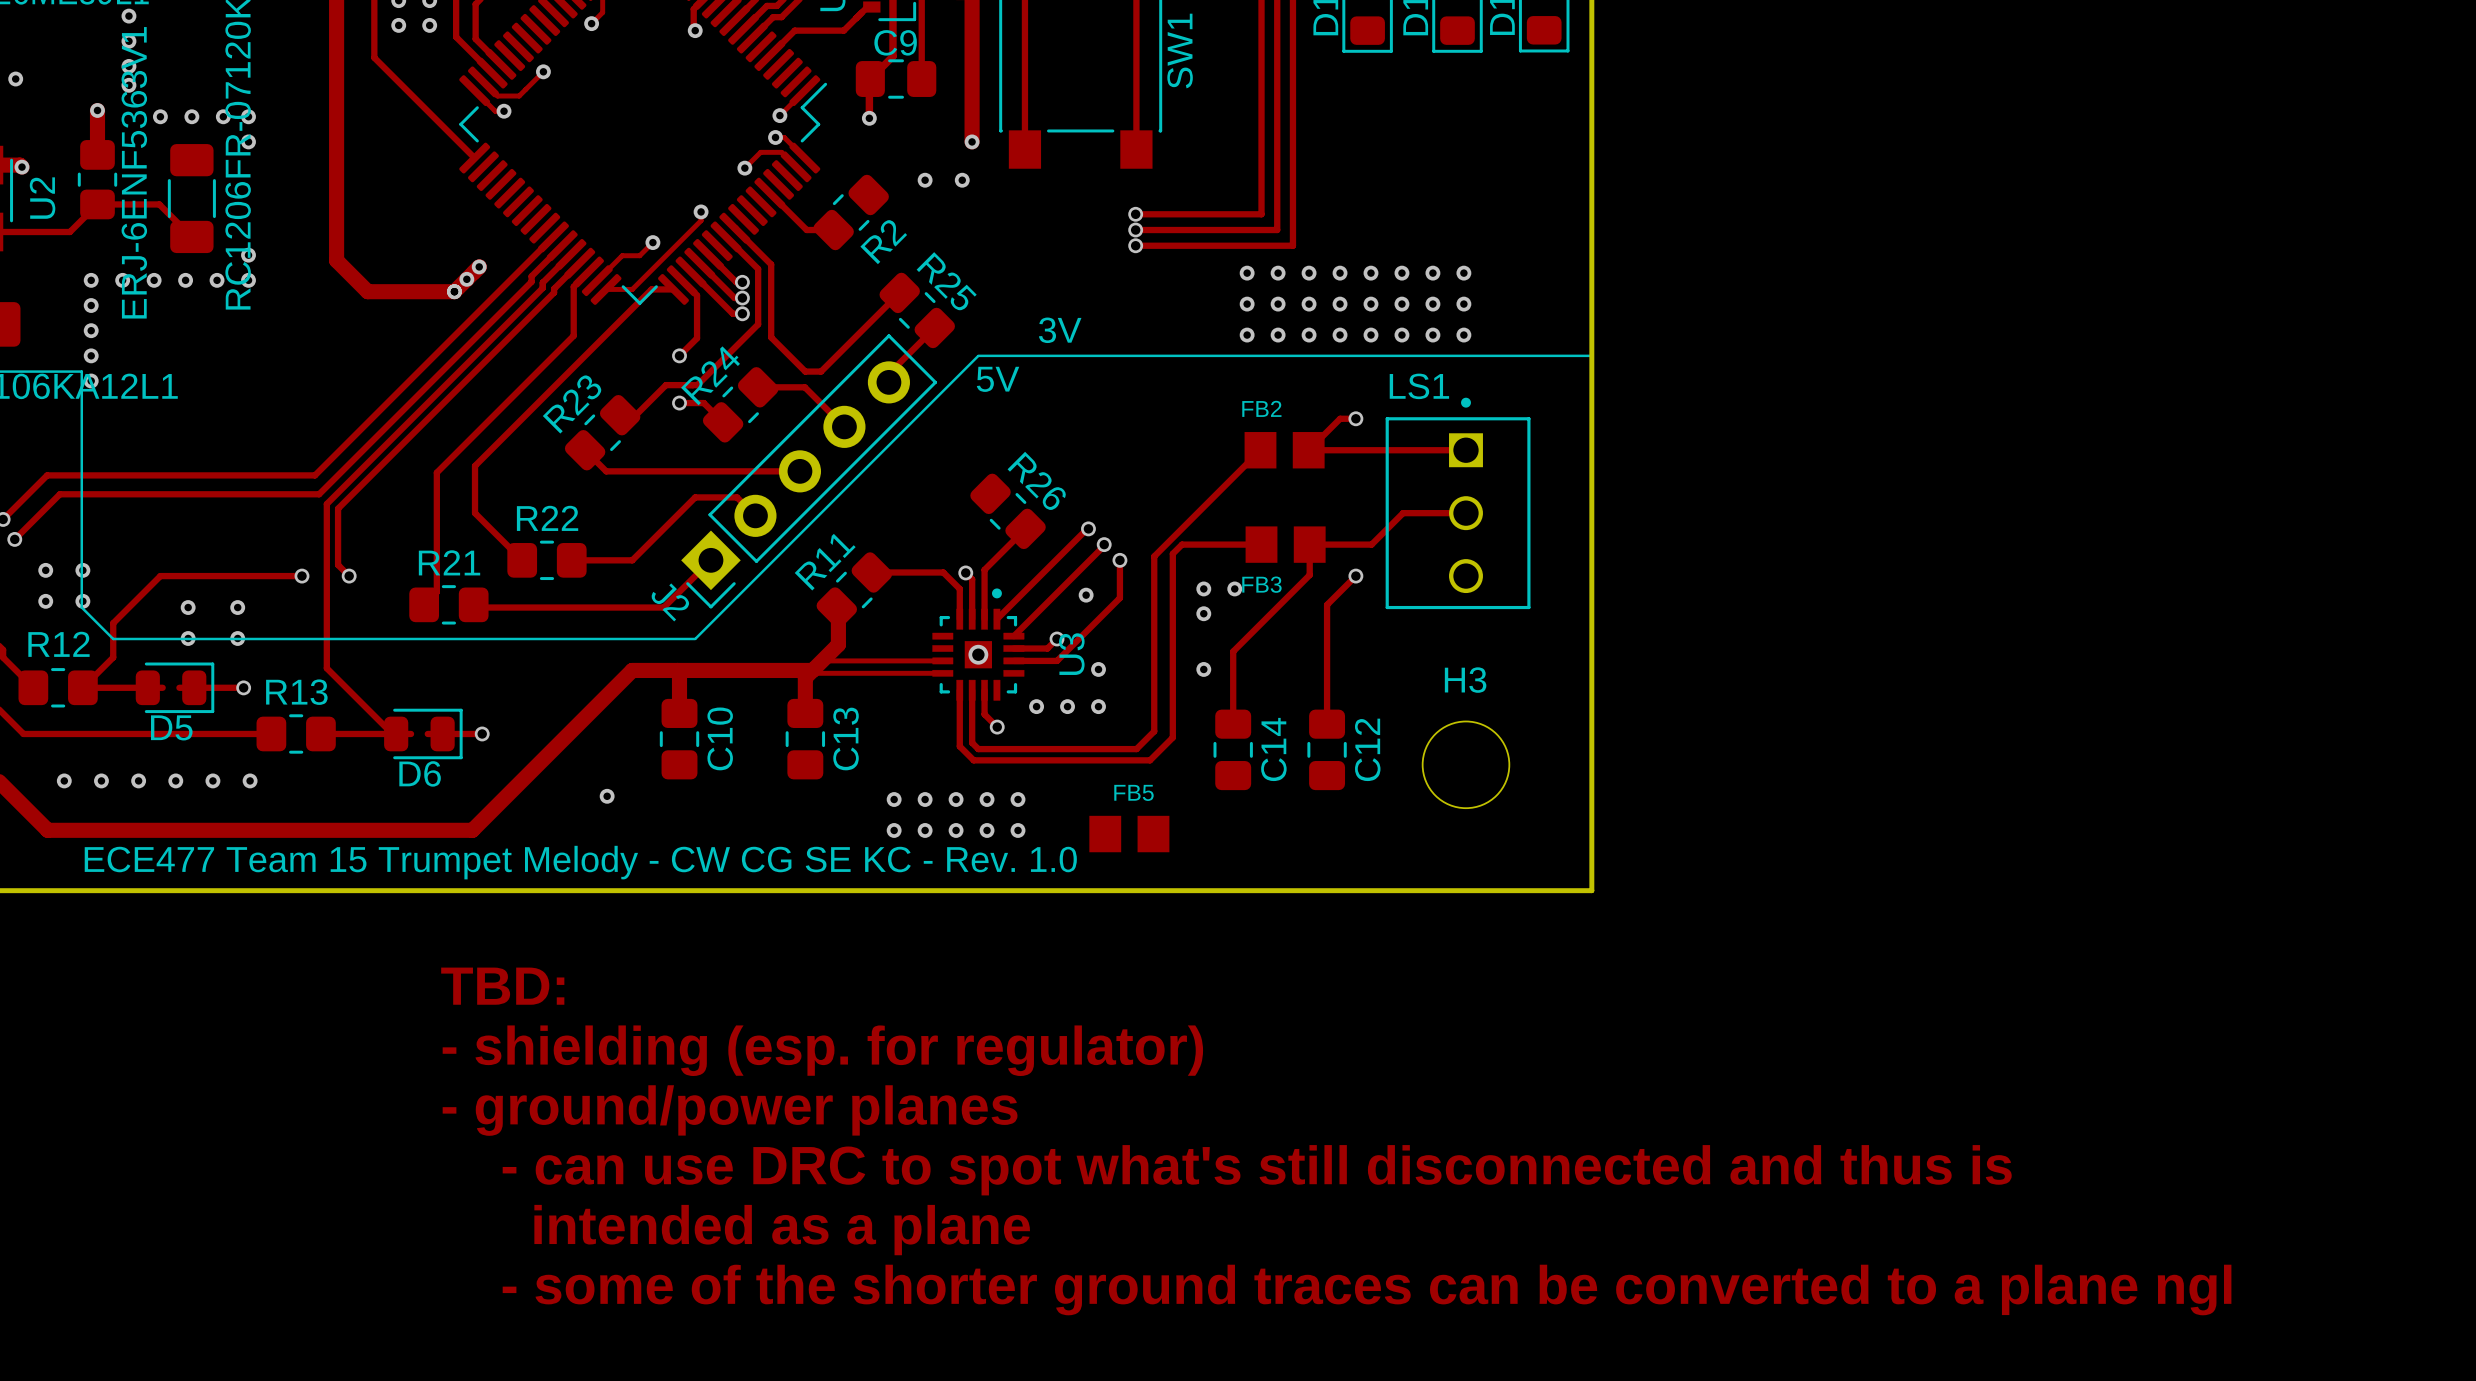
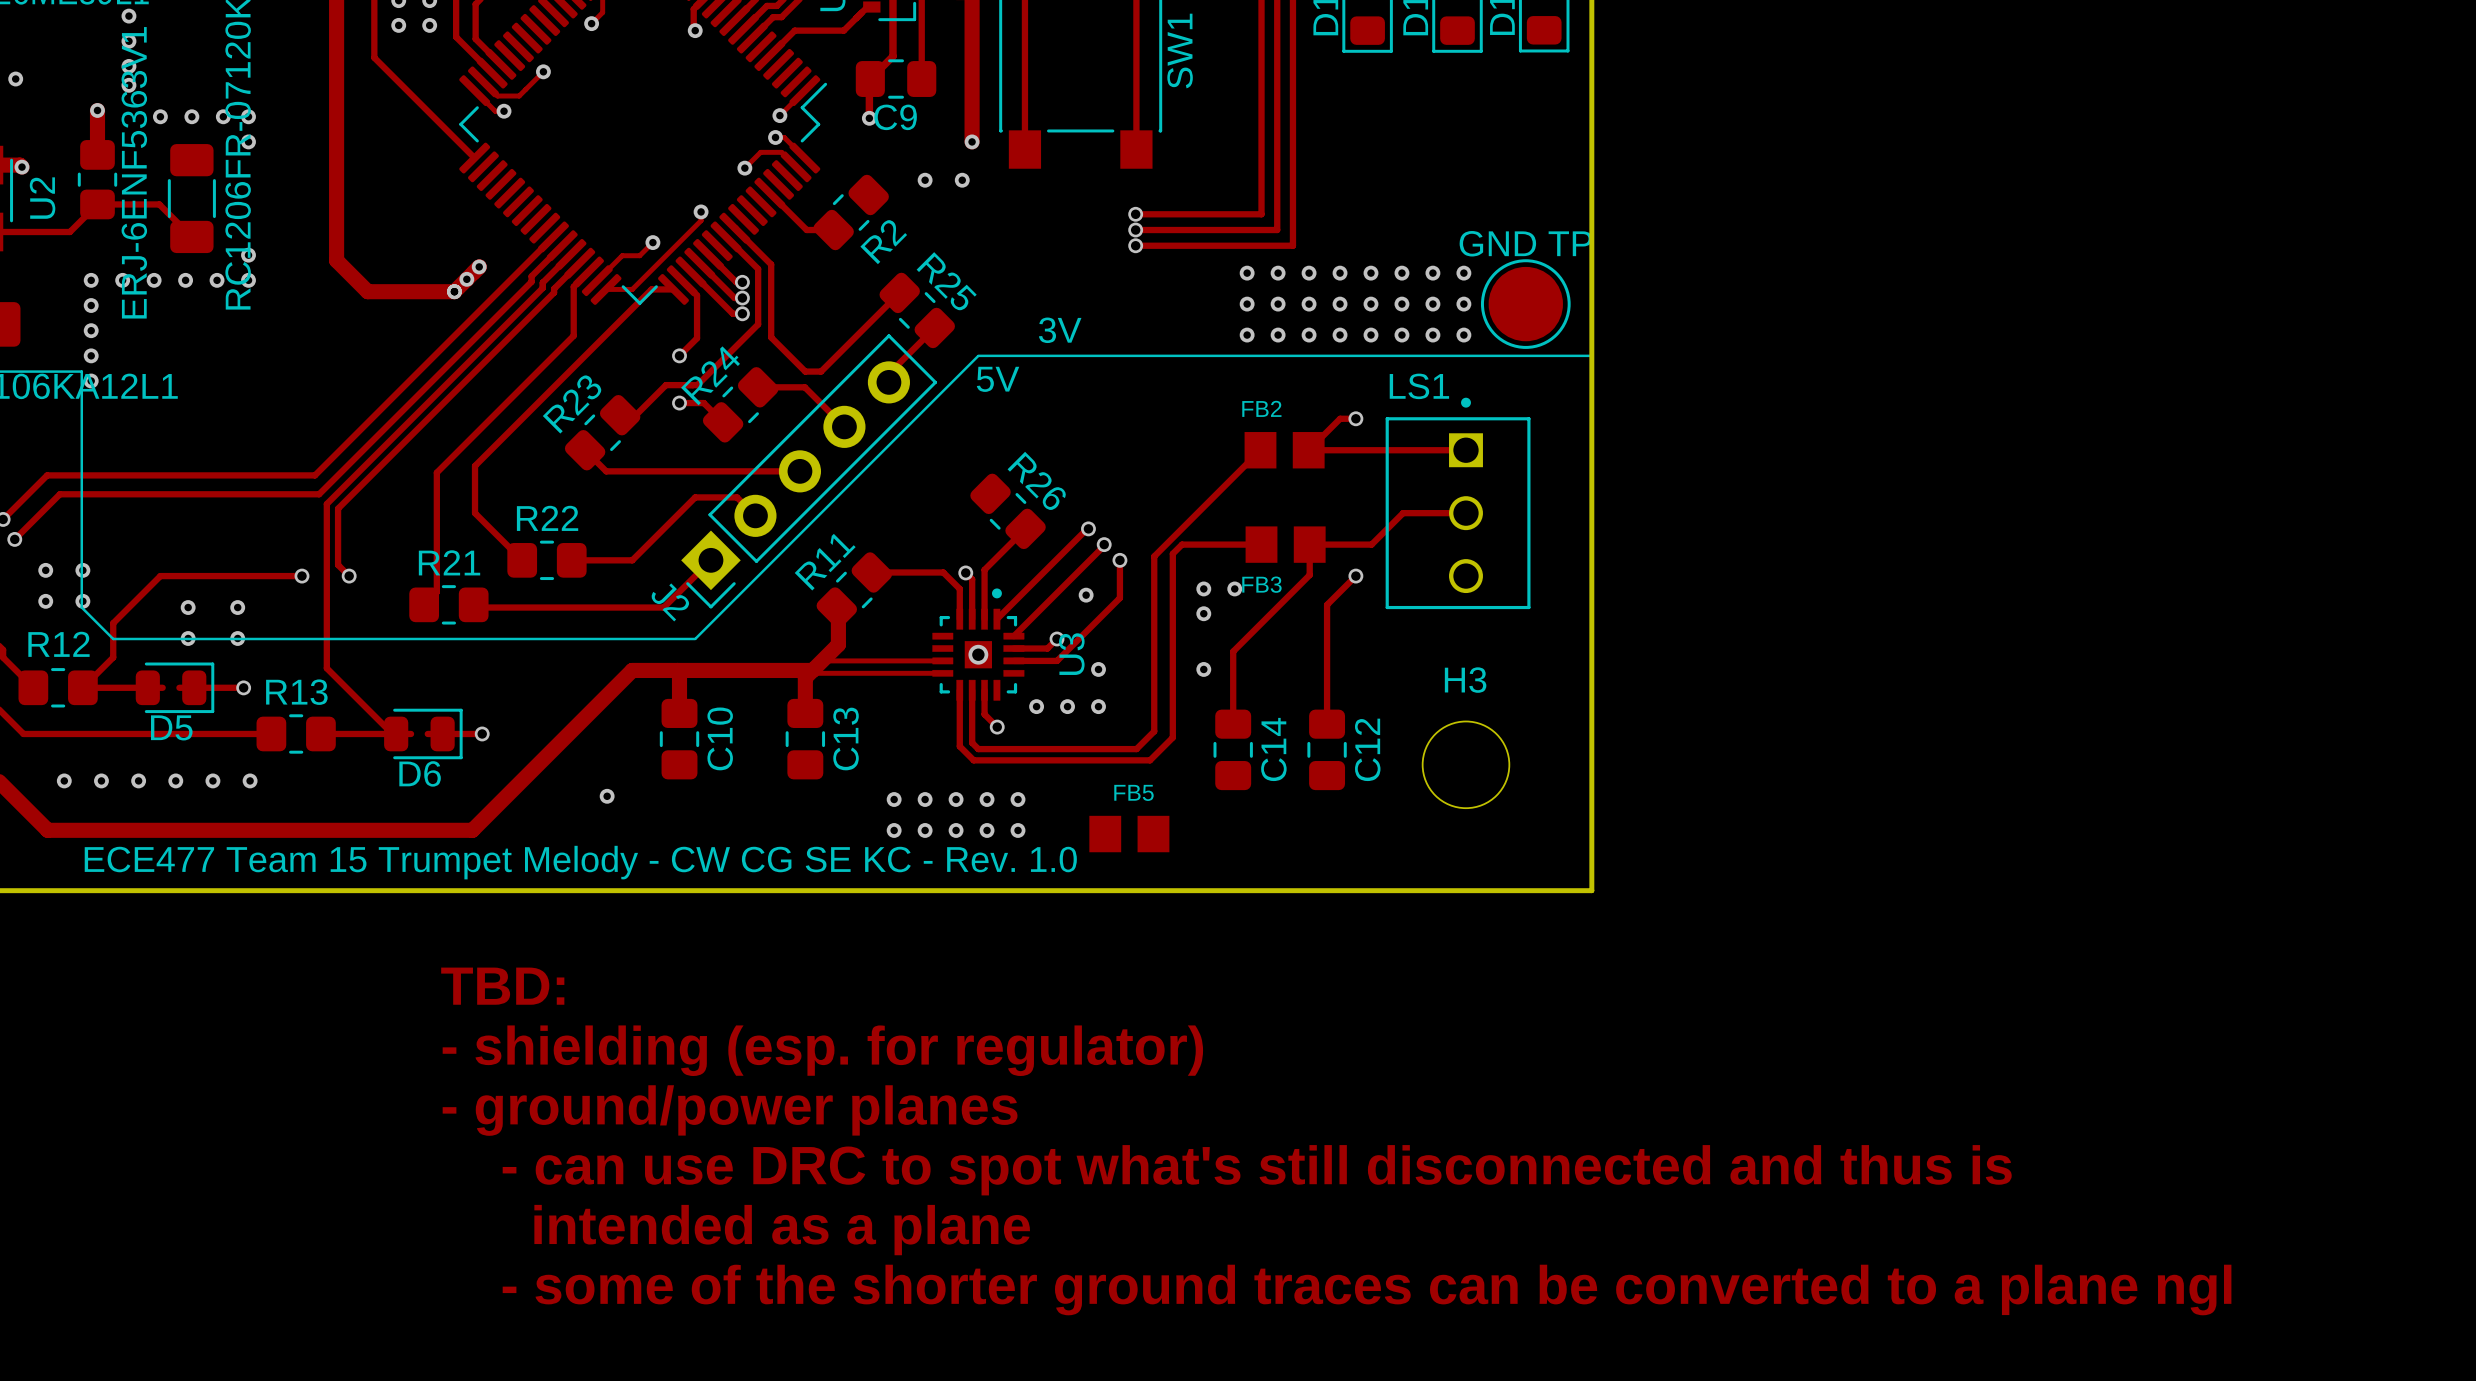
C9 name position: C9 (895, 42) -> C9 (895, 117)
GND TP: none -> (1525, 304)

